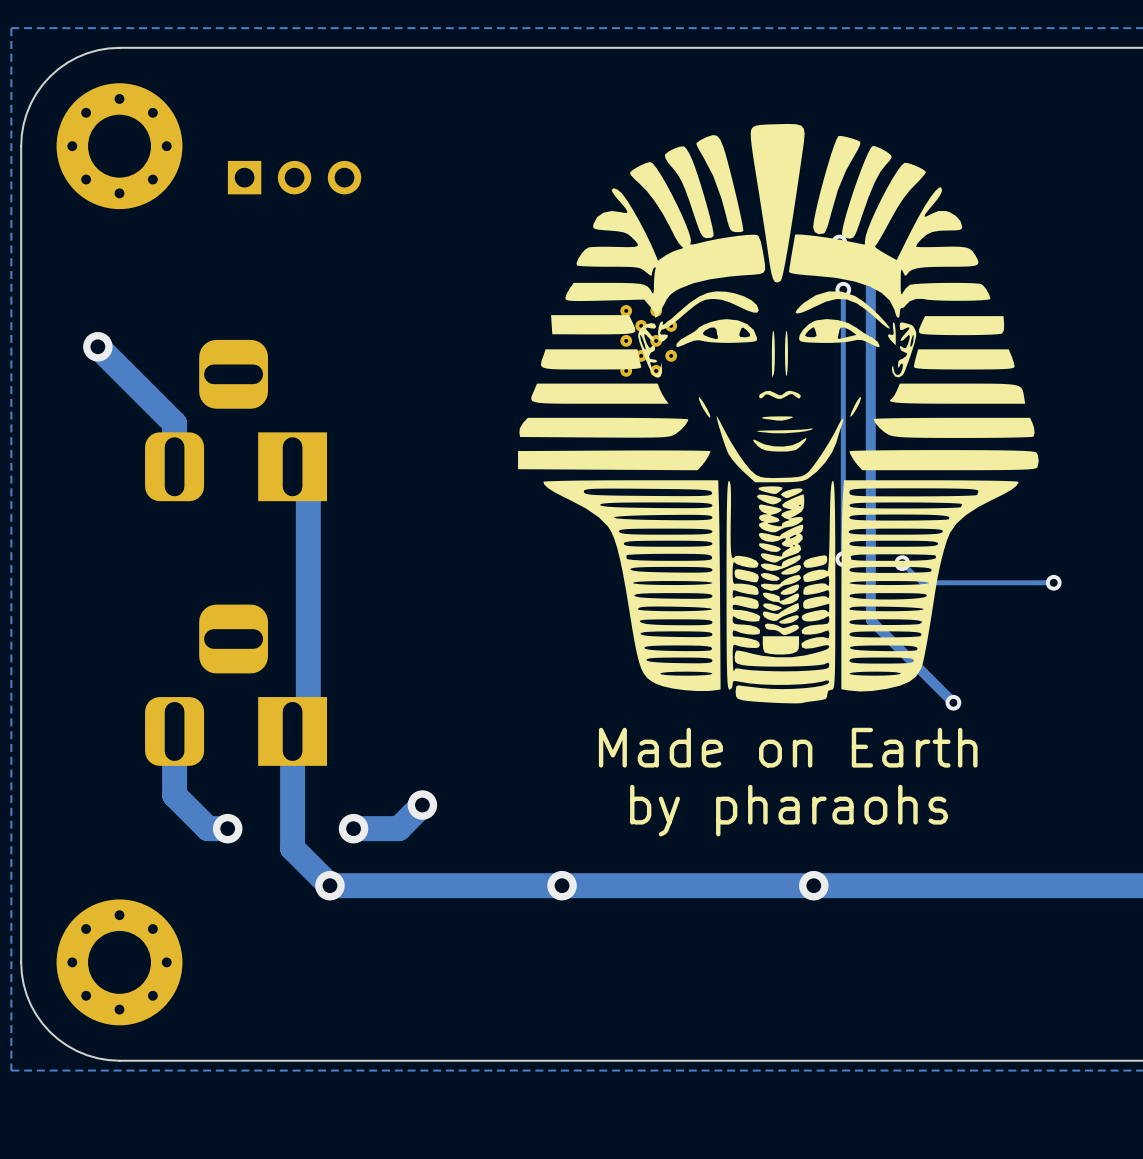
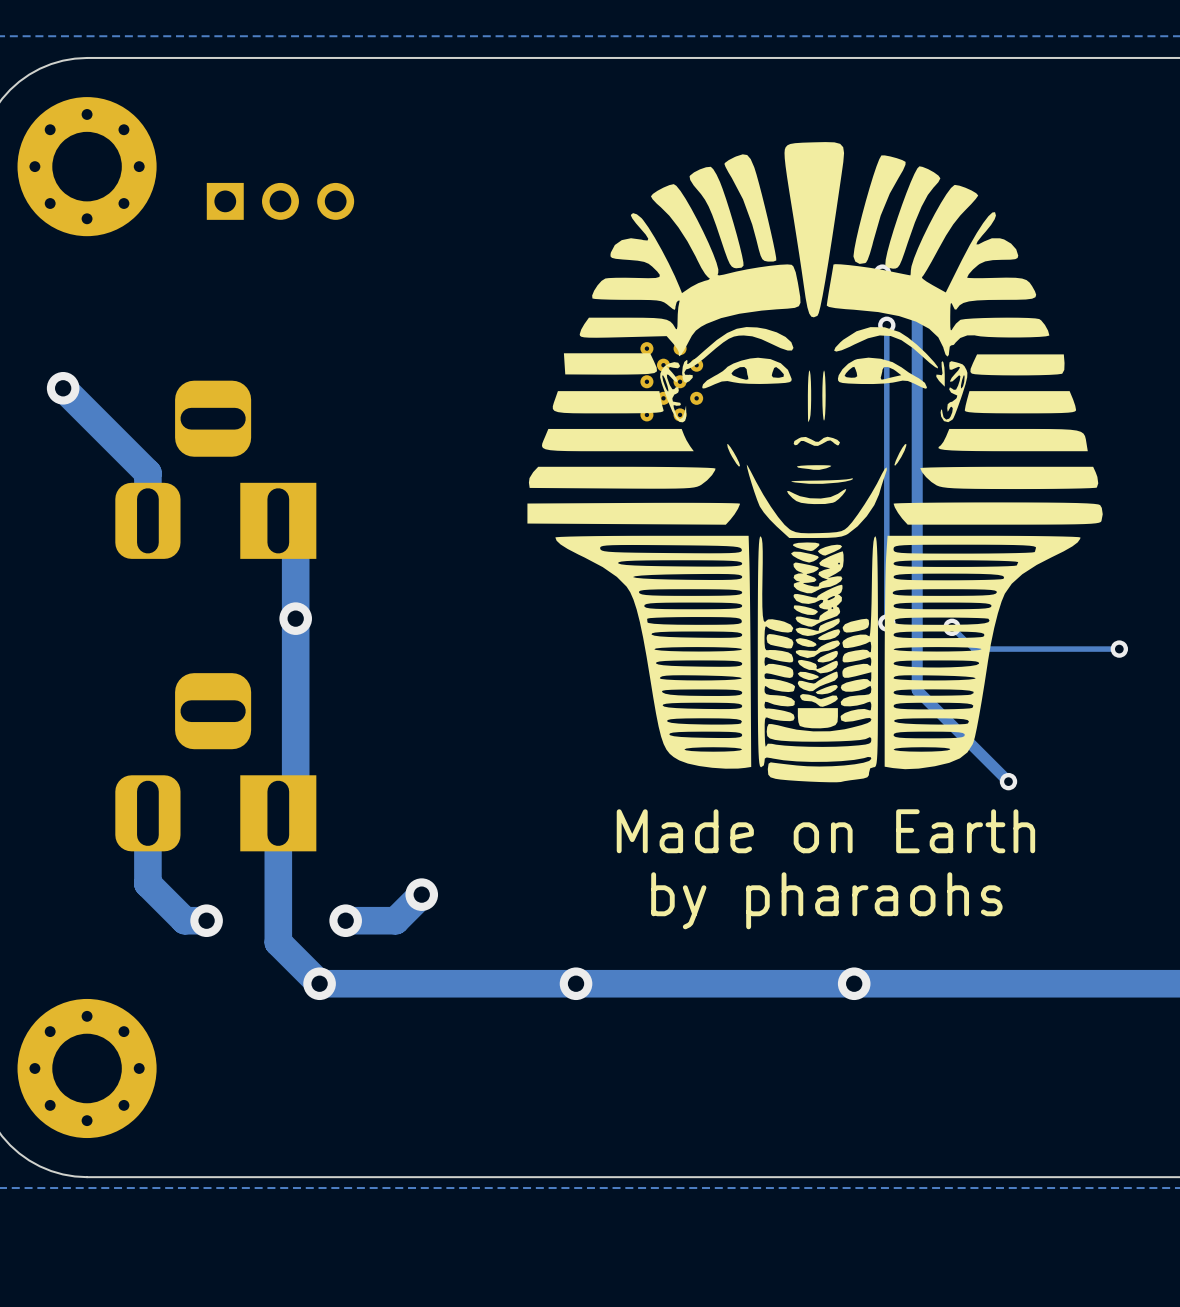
via: none -> (295, 618)

